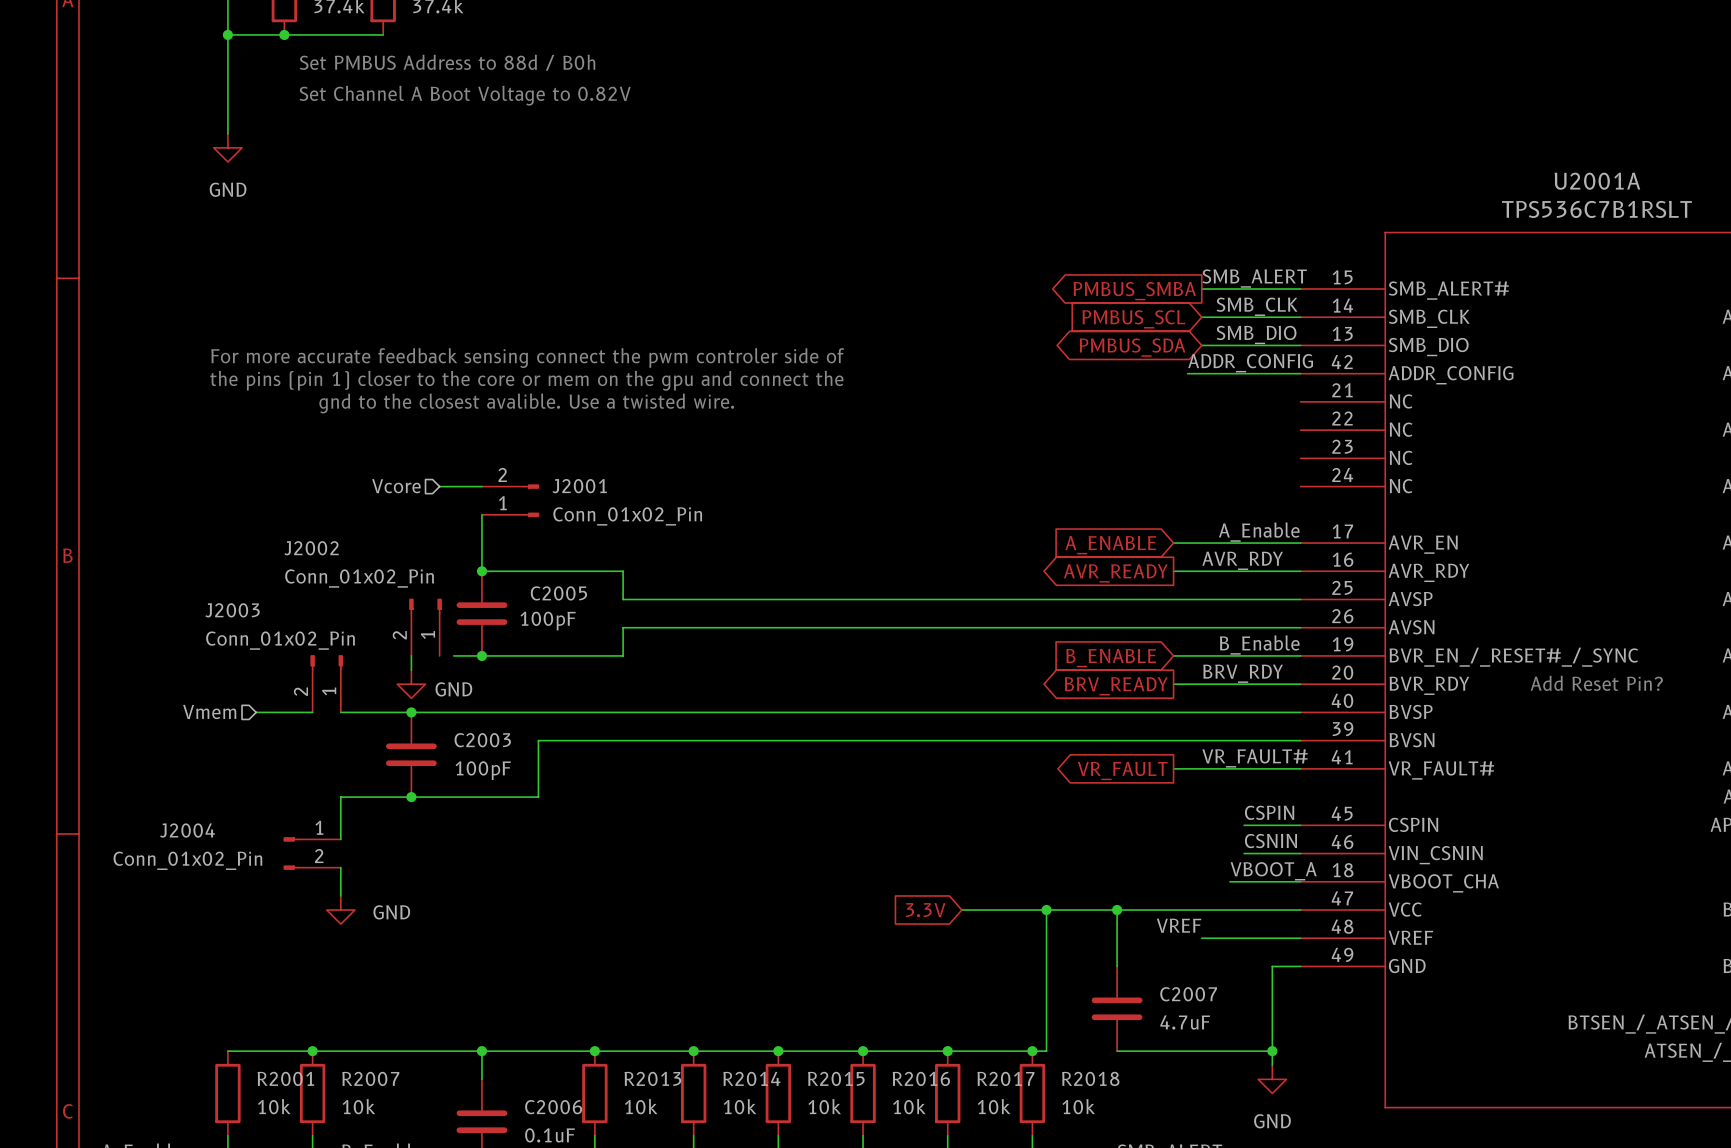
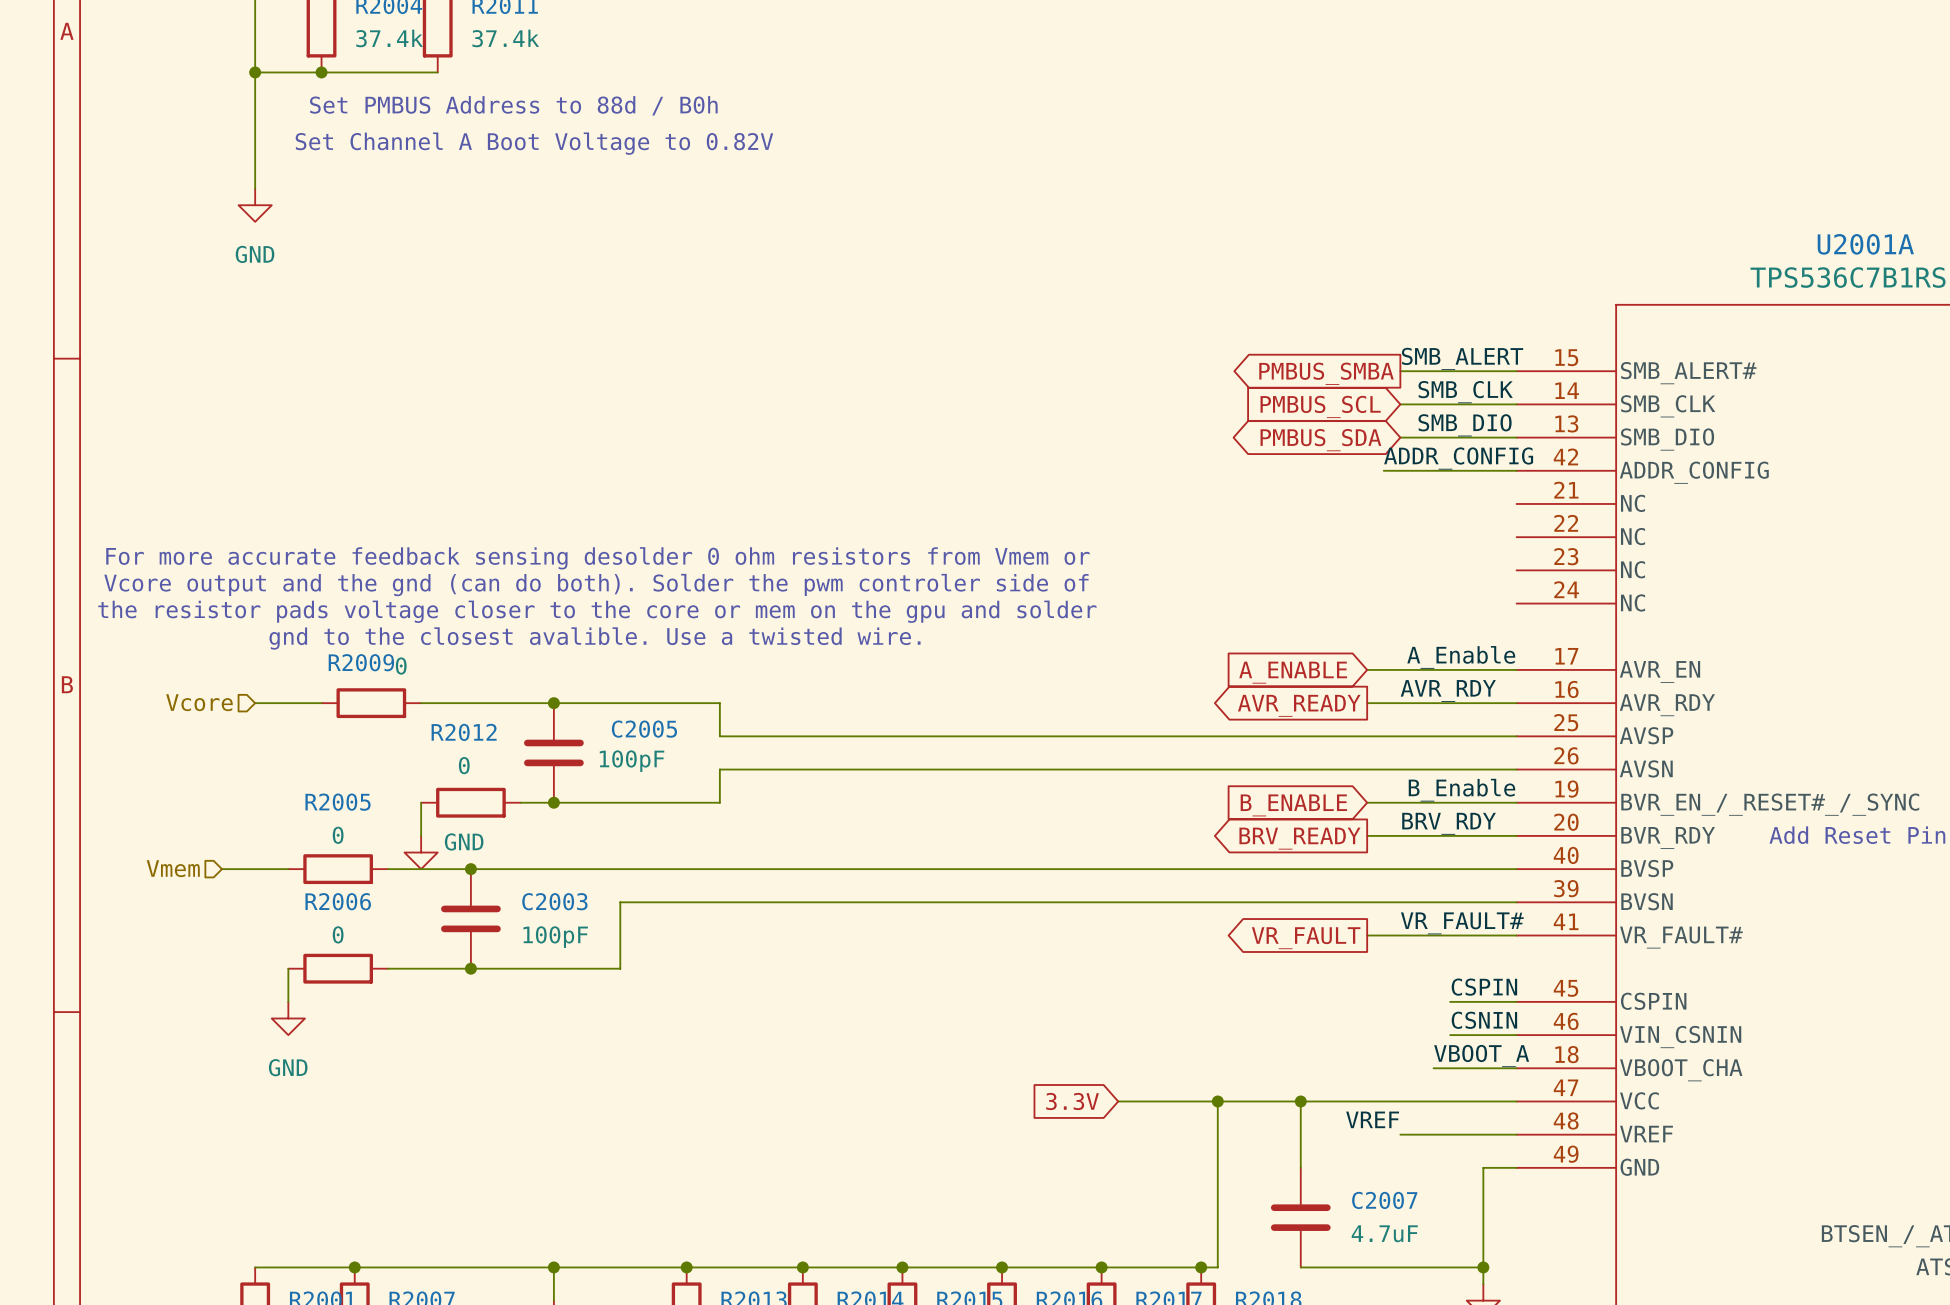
text: For more accurate feedback sensing connect the pwm controler side of (527, 358) -> none
text: the pins (pin 1) closer to the core or mem on the gpu and connect the (526, 380) -> none
text position: gnd to the closest avalible. Use a twisted wire. (526, 403) -> gnd to the closest avalible. Use a twisted wire. (595, 638)
text: none -> For more accurate feedback sensing desolder 0 ohm resistors from Vmem or (597, 558)
text: none -> Vcore output and the gnd (can do both). Solder the pwm controler side of (596, 585)
hierarchical label position: Vcore (396, 486) -> Vcore (199, 702)
wire: (439, 486) (481, 486) -> none
text: none -> the resistor pads voltage closer to the core or mem on the gpu and solder (597, 611)
J2001: Conn_01x02_Pin (510, 500) -> none
wire: (481, 514) (481, 571) -> (421, 703) (553, 703)
wire: none -> (255, 703) (321, 703)
R2009: none -> 0 (371, 703)
J2002: Conn_01x02_Pin (425, 627) -> none
wire: none -> (421, 802) (421, 835)
wire: (411, 655) (411, 670) -> none
R2012: none -> 0 (470, 802)
J2003: Conn_01x02_Pin (326, 683) -> none
power symbol position: GND (411, 684) -> GND (421, 852)
power symbol text position: GND (453, 689) -> GND (464, 841)
hierarchical label position: Vmem (209, 711) -> Vmem (173, 868)
wire: (256, 712) (312, 712) -> (288, 869) (221, 869)
R2005: none -> 0 (338, 869)
R2006: none -> 0 (338, 968)
wire: (340, 797) (340, 839) -> none
power symbol: none -> GND (288, 1018)
J2004: Conn_01x02_Pin (312, 853) -> none
wire: (340, 867) (340, 895) -> (288, 968) (288, 1001)
power symbol: GND (340, 910) -> none

